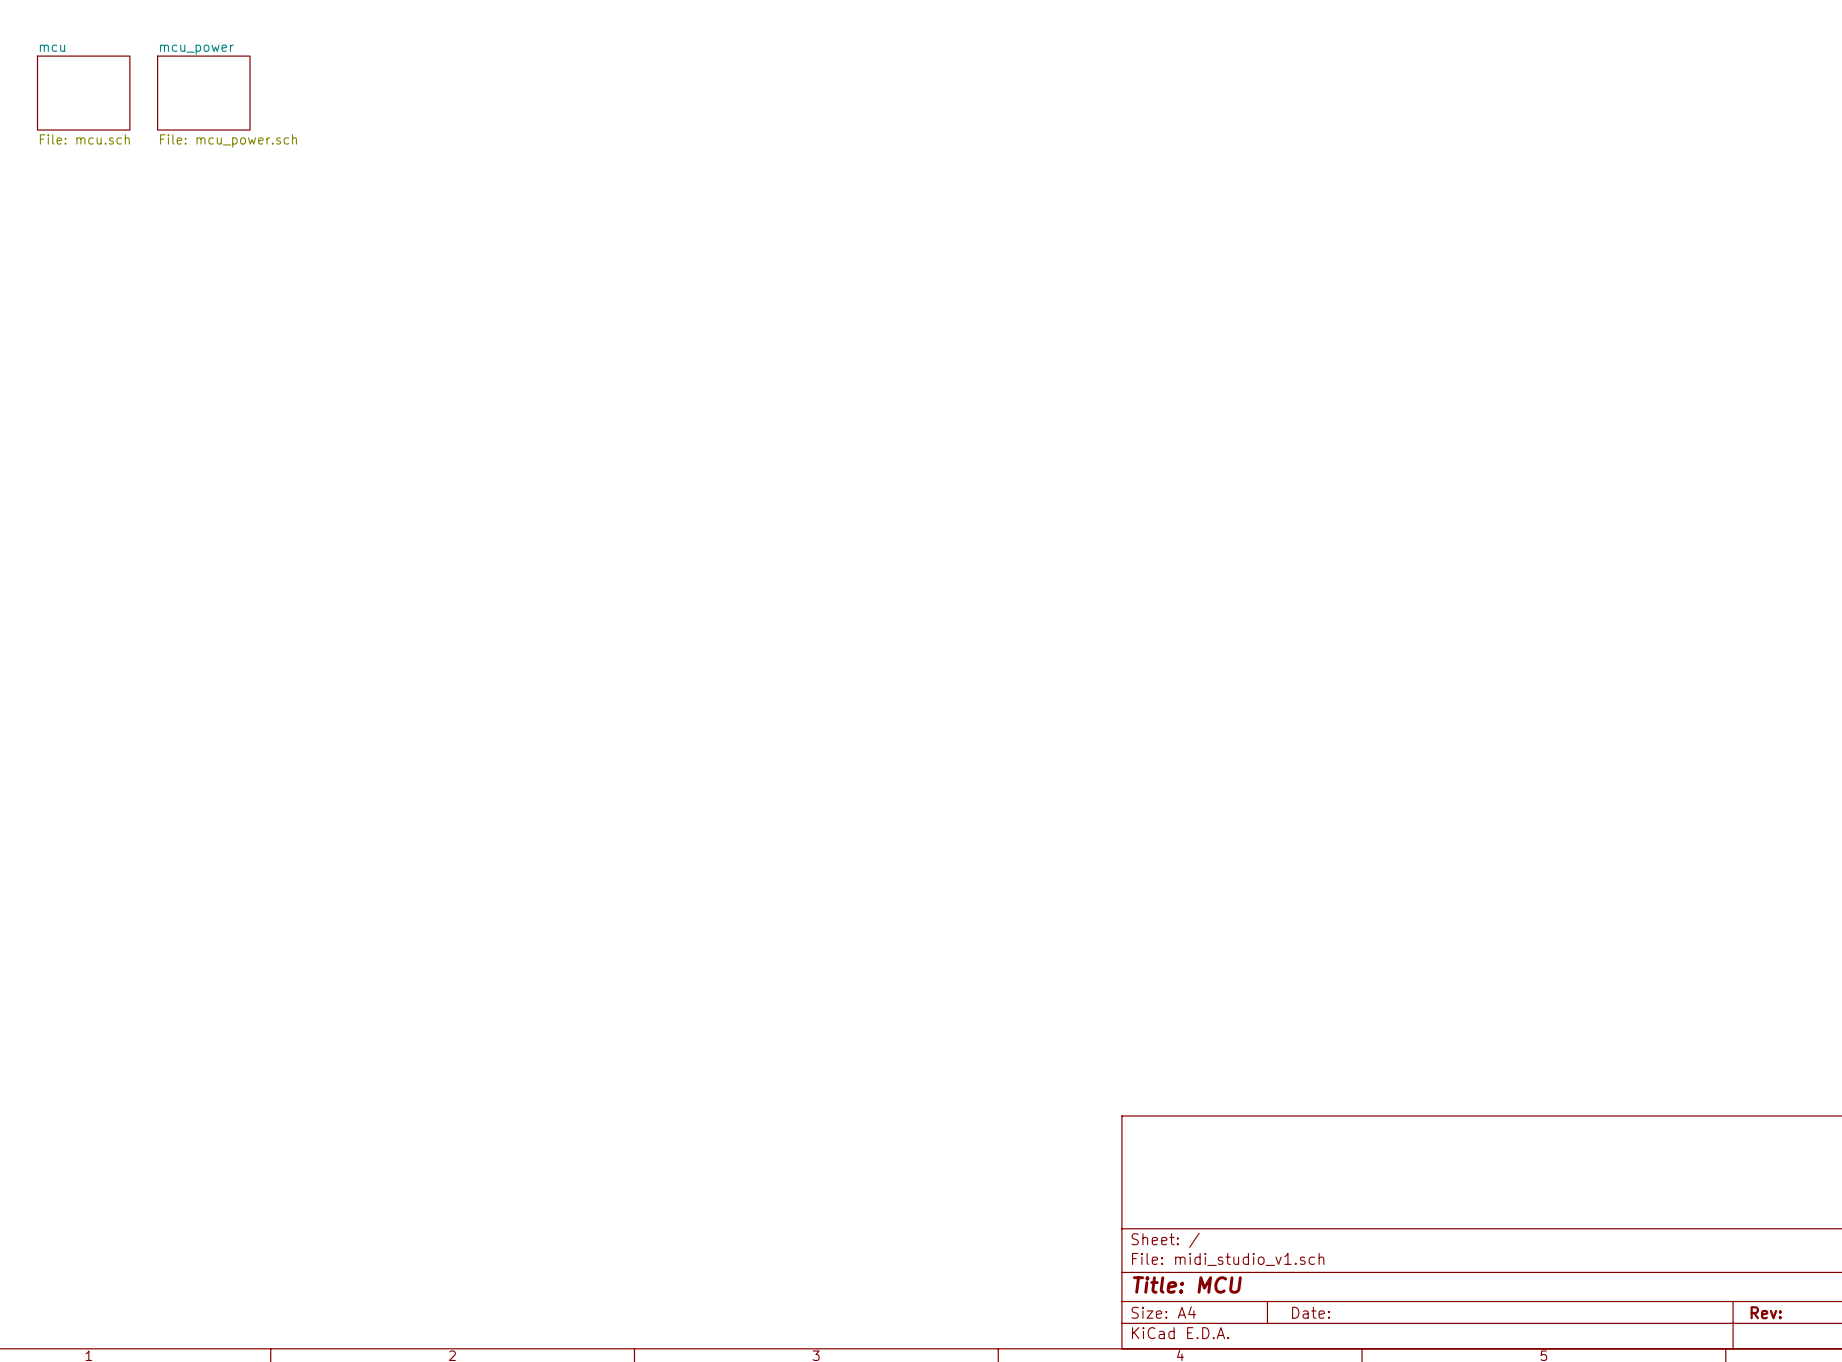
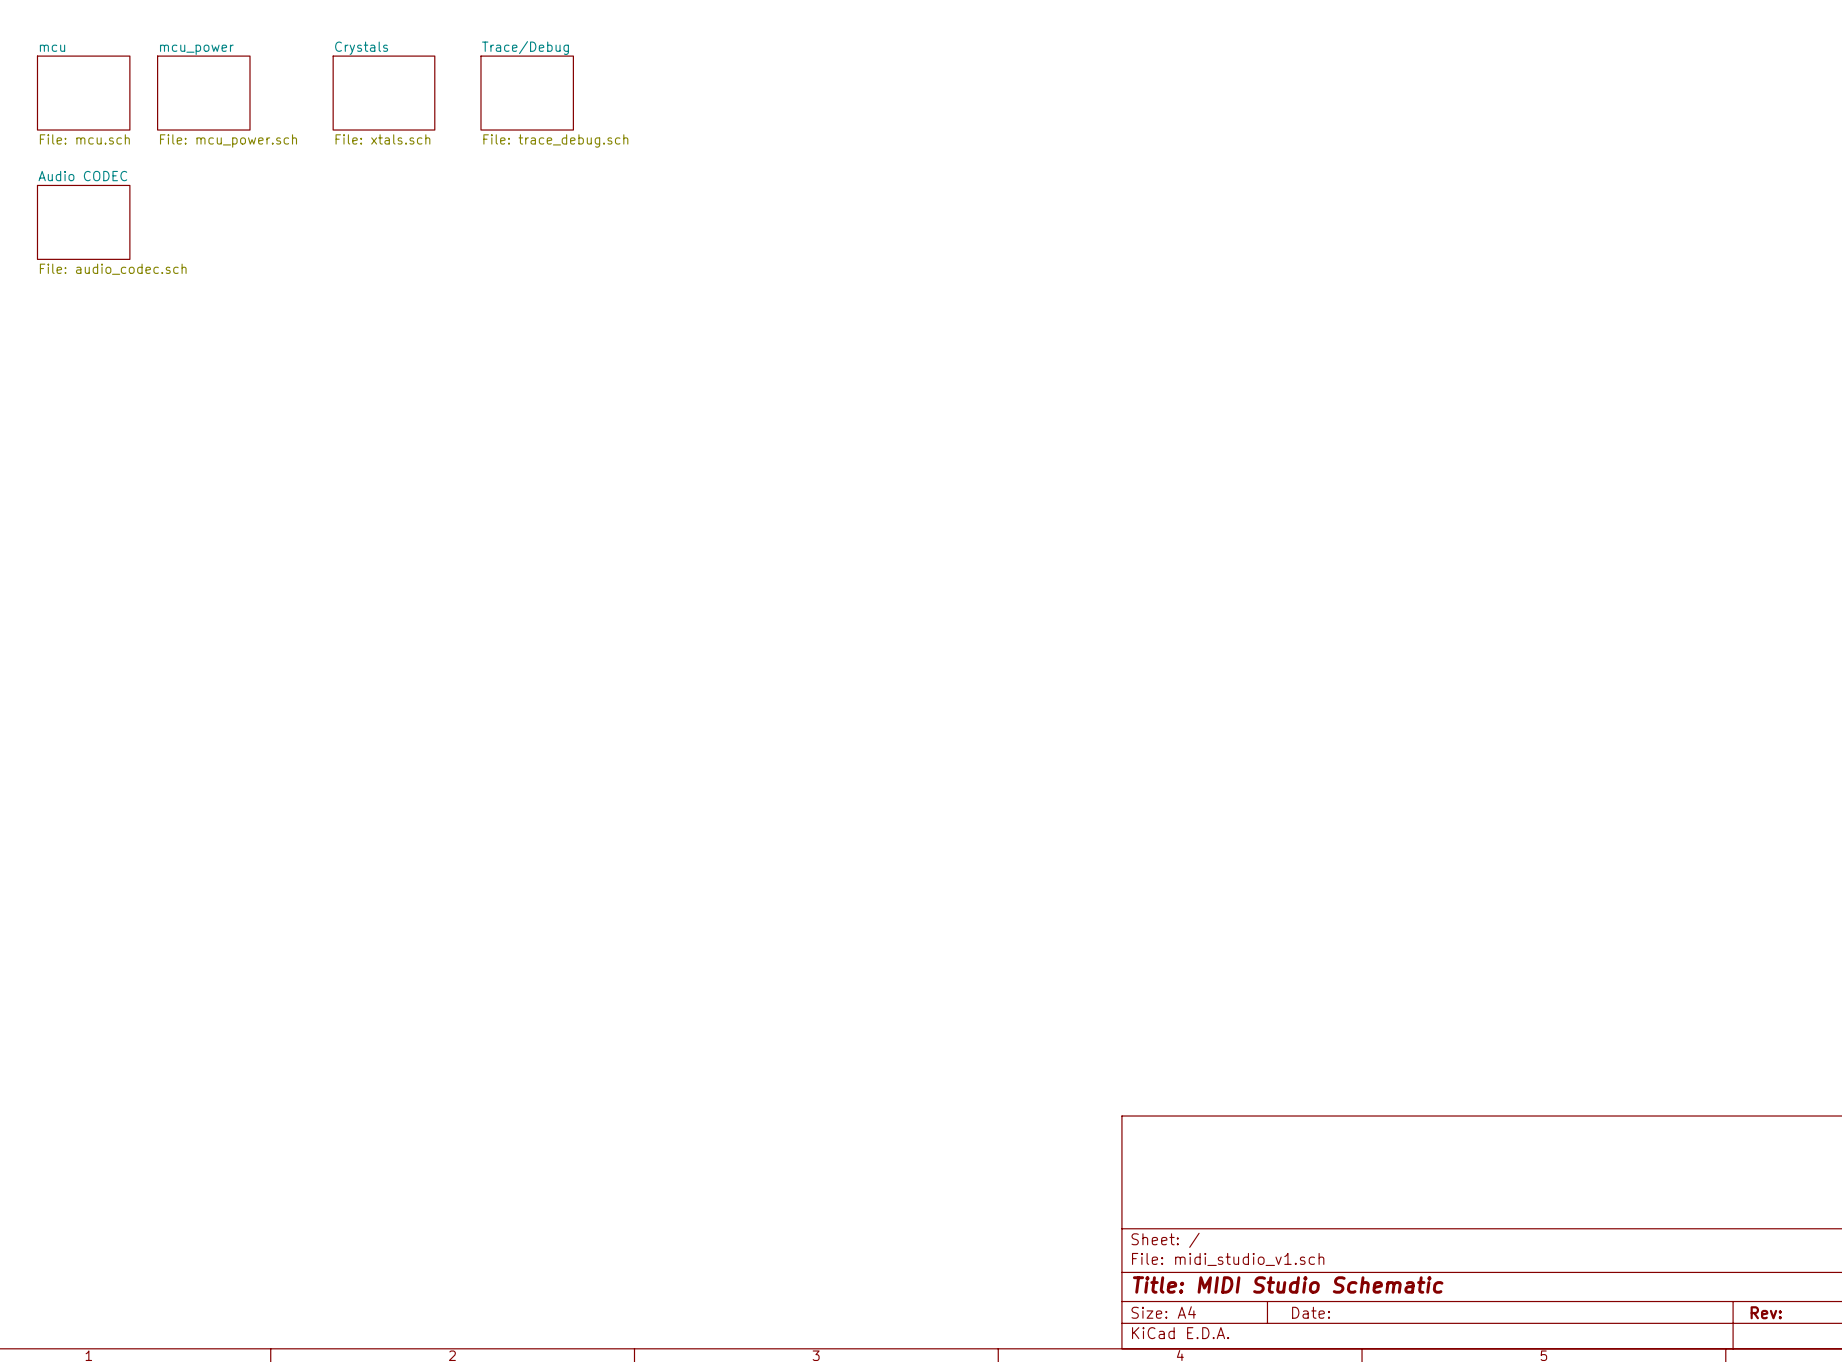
sheet Crystals: none -> File: xtals.sch (383, 93)
sheet Trace/Debug: none -> File: trace_debug.sch (527, 93)
sheet Audio CODEC: none -> File: audio_codec.sch (83, 222)
title block: Title: MCU (1187, 1284) -> Title: MIDI Studio Schematic (1288, 1284)

